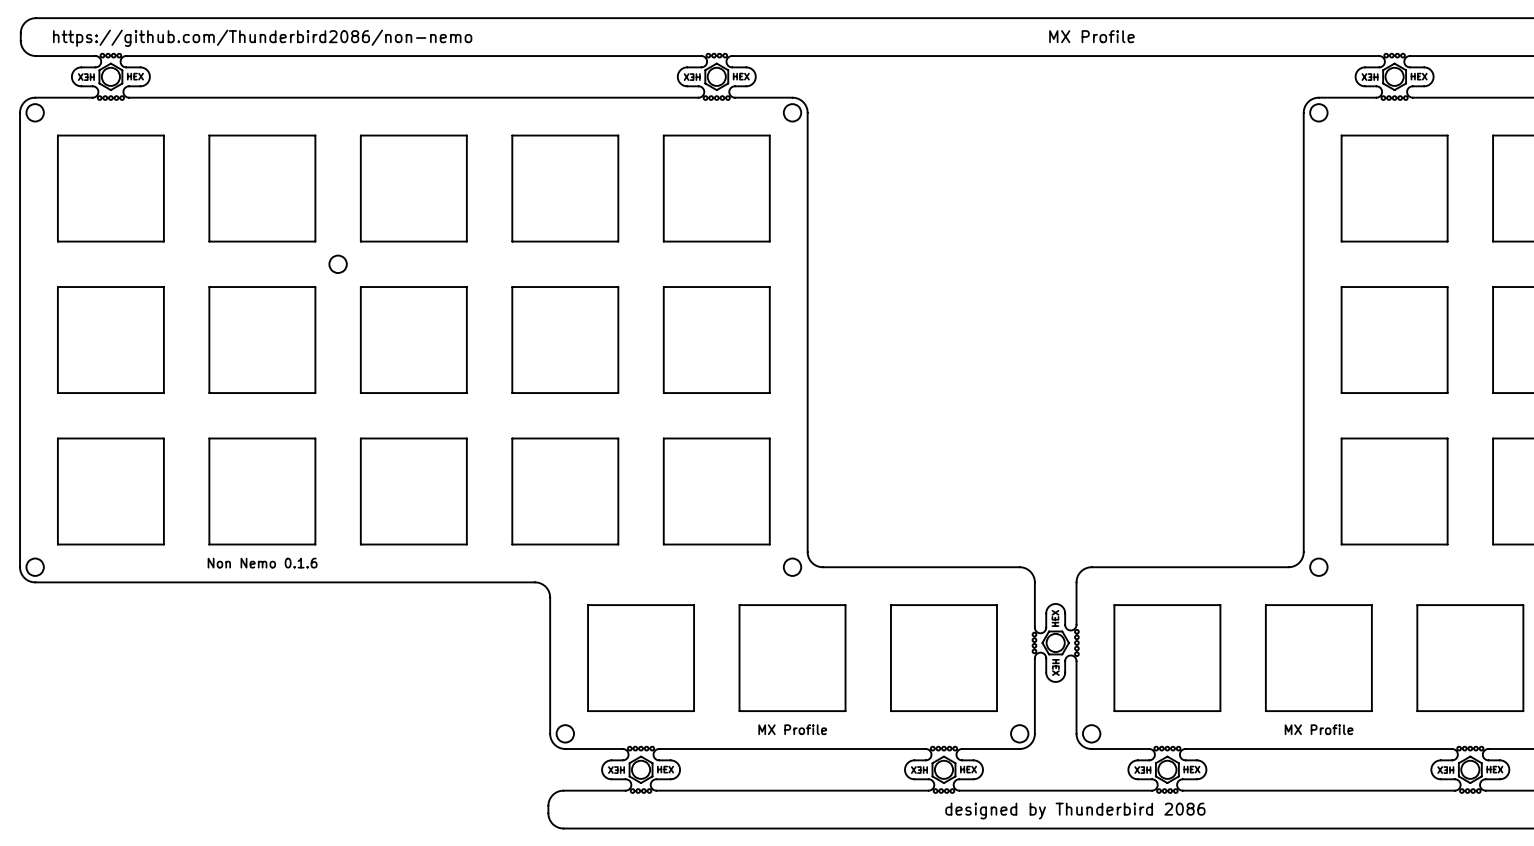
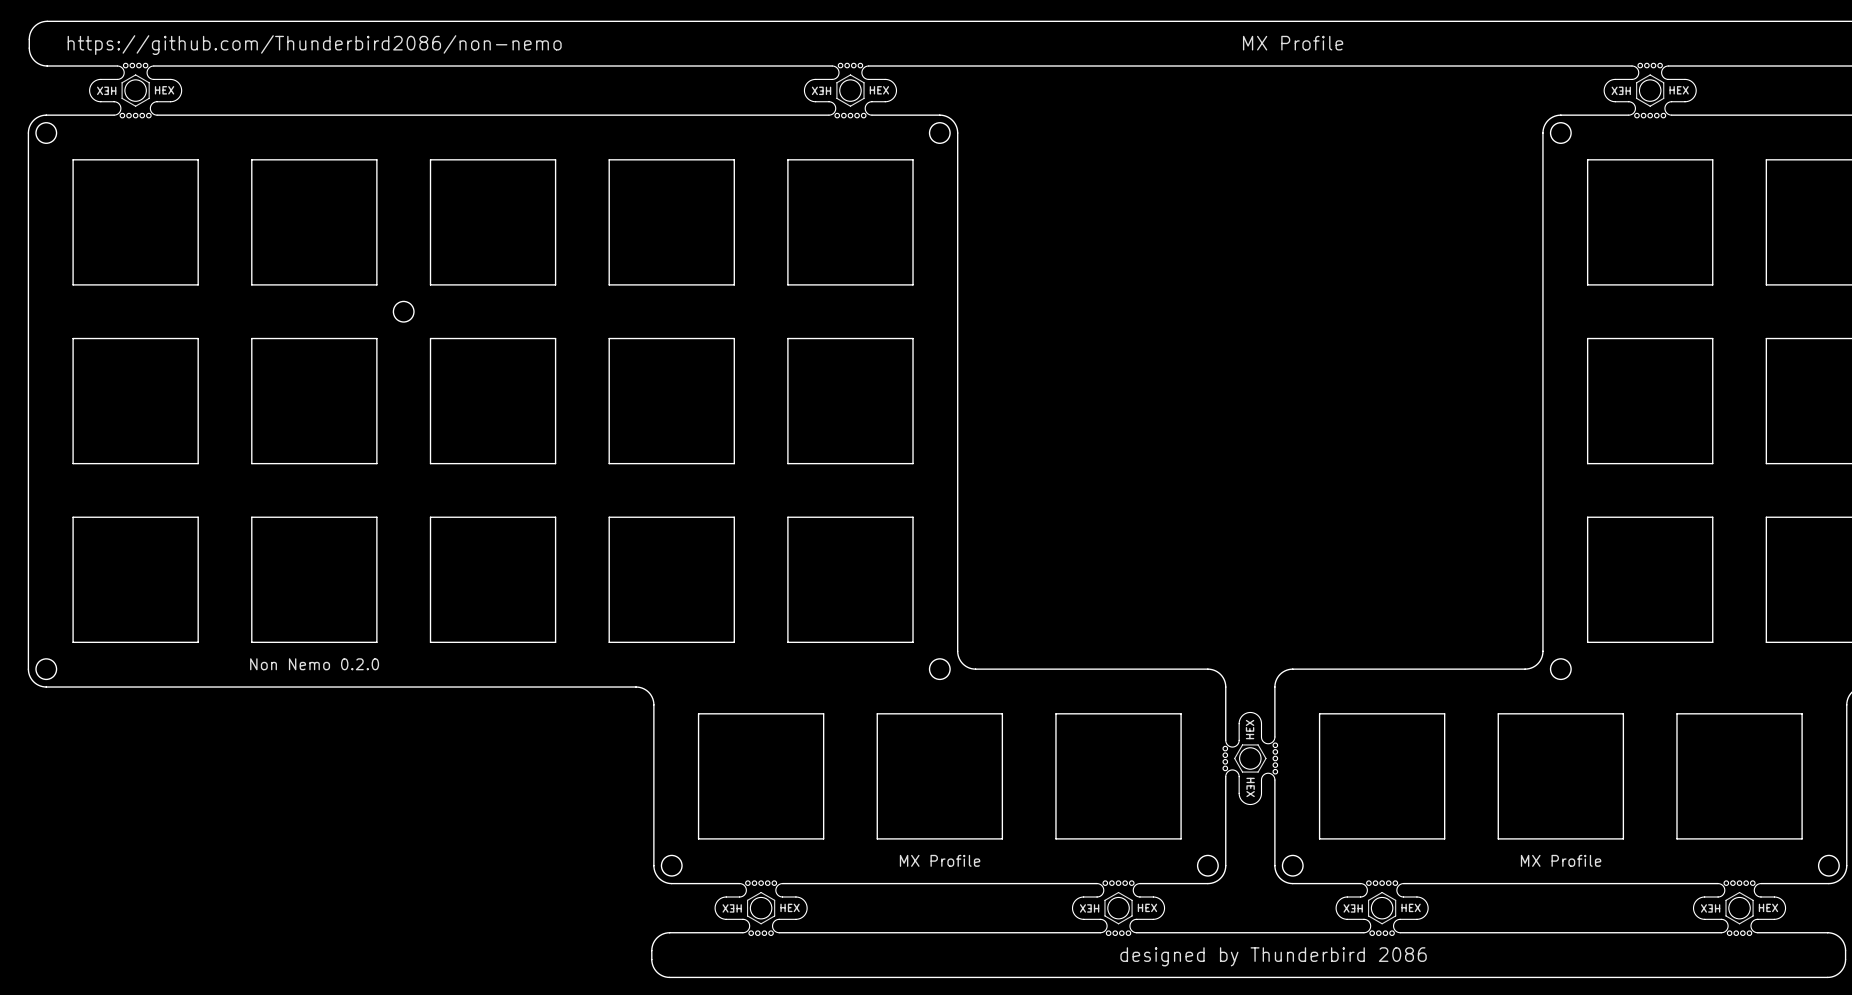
text: Non Nemo 0.1.6 (262, 563) -> Non Nemo 0.2.0 (314, 664)

